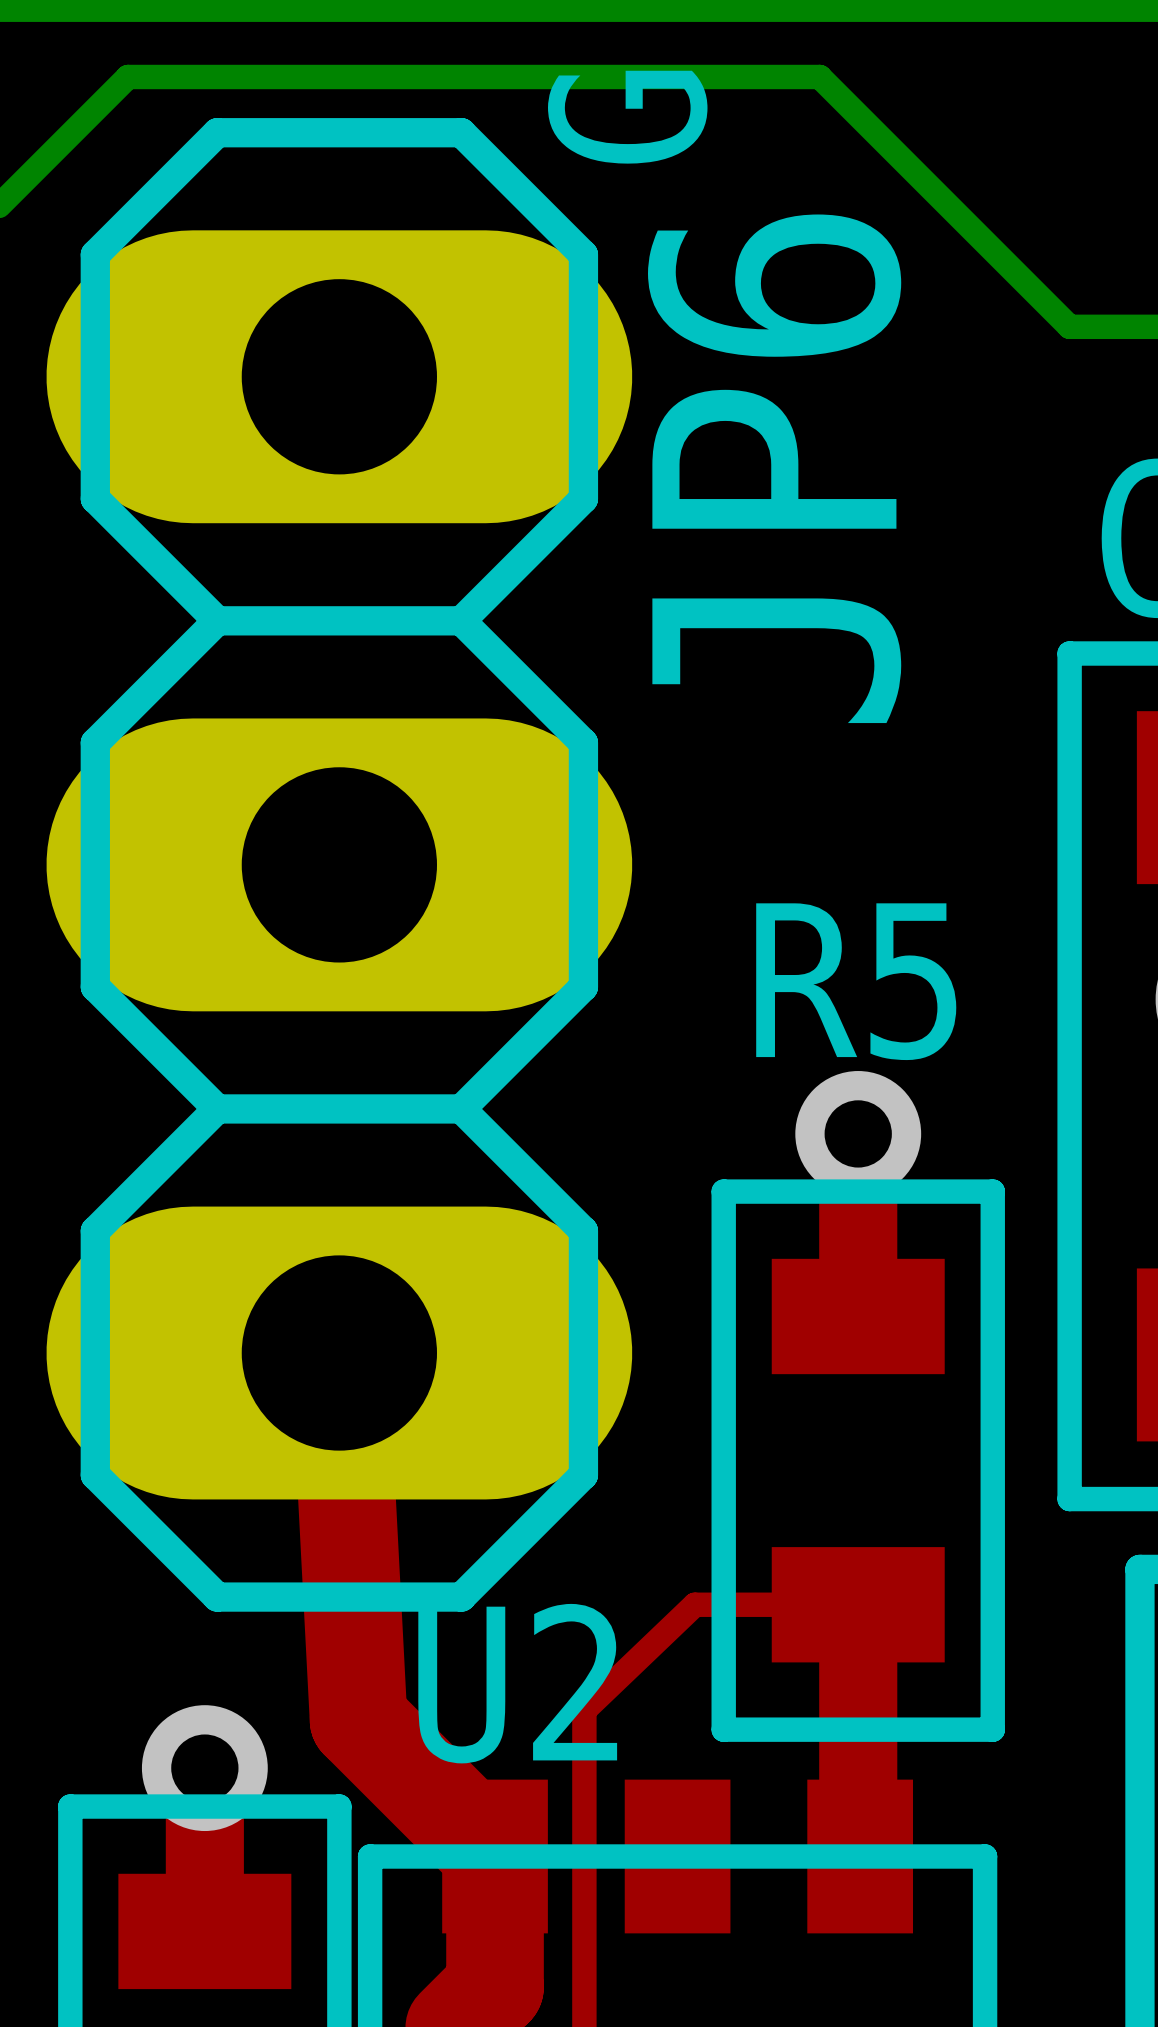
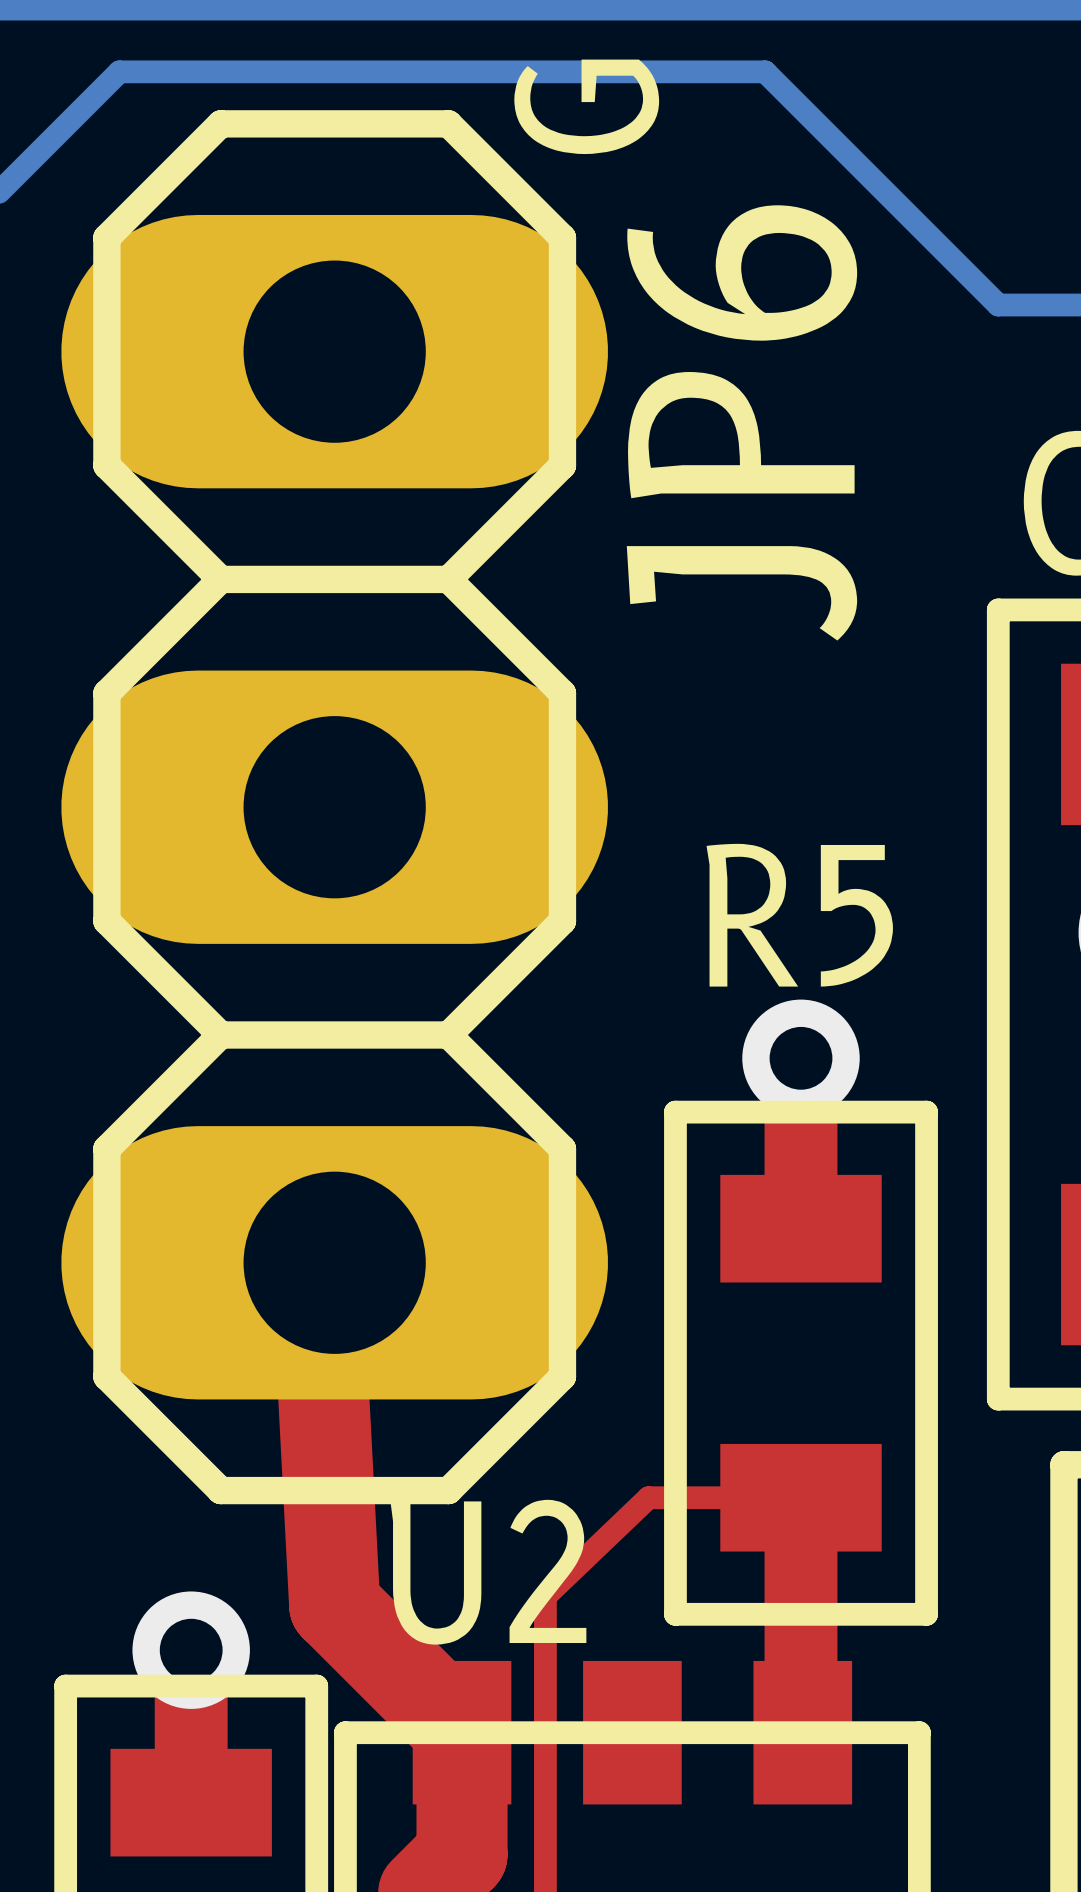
JP6 position: (339, 864) -> (334, 807)

